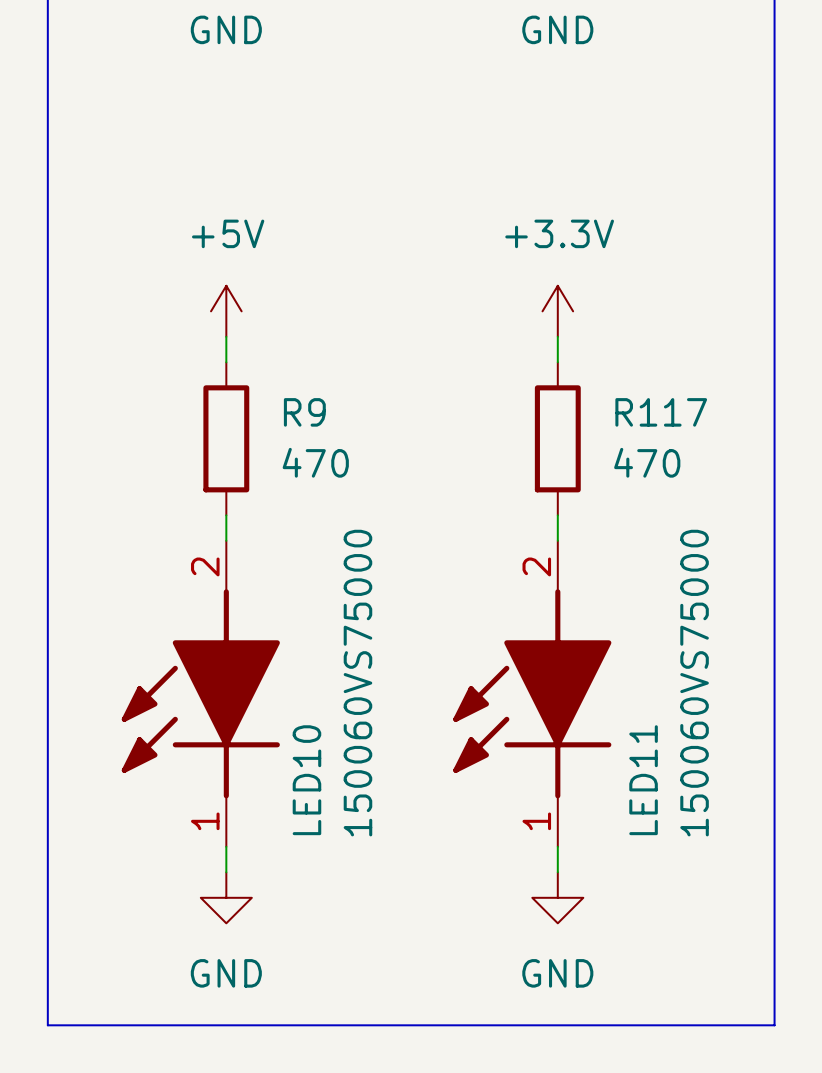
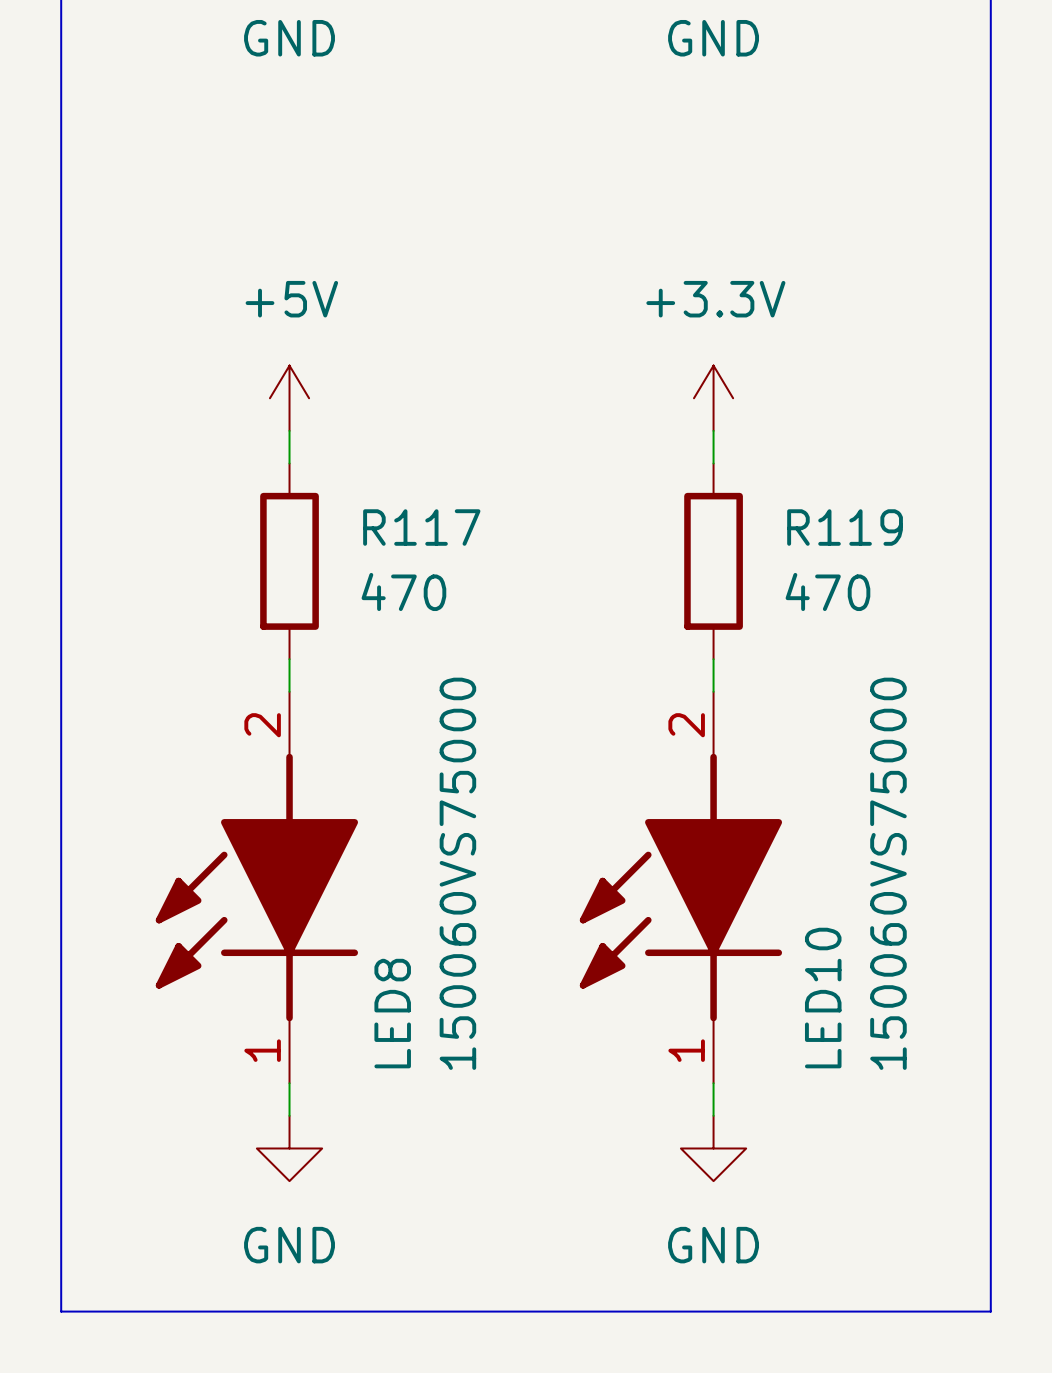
R9 name: R9 (304, 412) -> R117 (421, 527)
R117 name: R117 (661, 412) -> R119 (845, 527)
LED10 name: LED10 (306, 780) -> LED8 (392, 1013)
LED11 name: LED11 (643, 780) -> LED10 (823, 998)

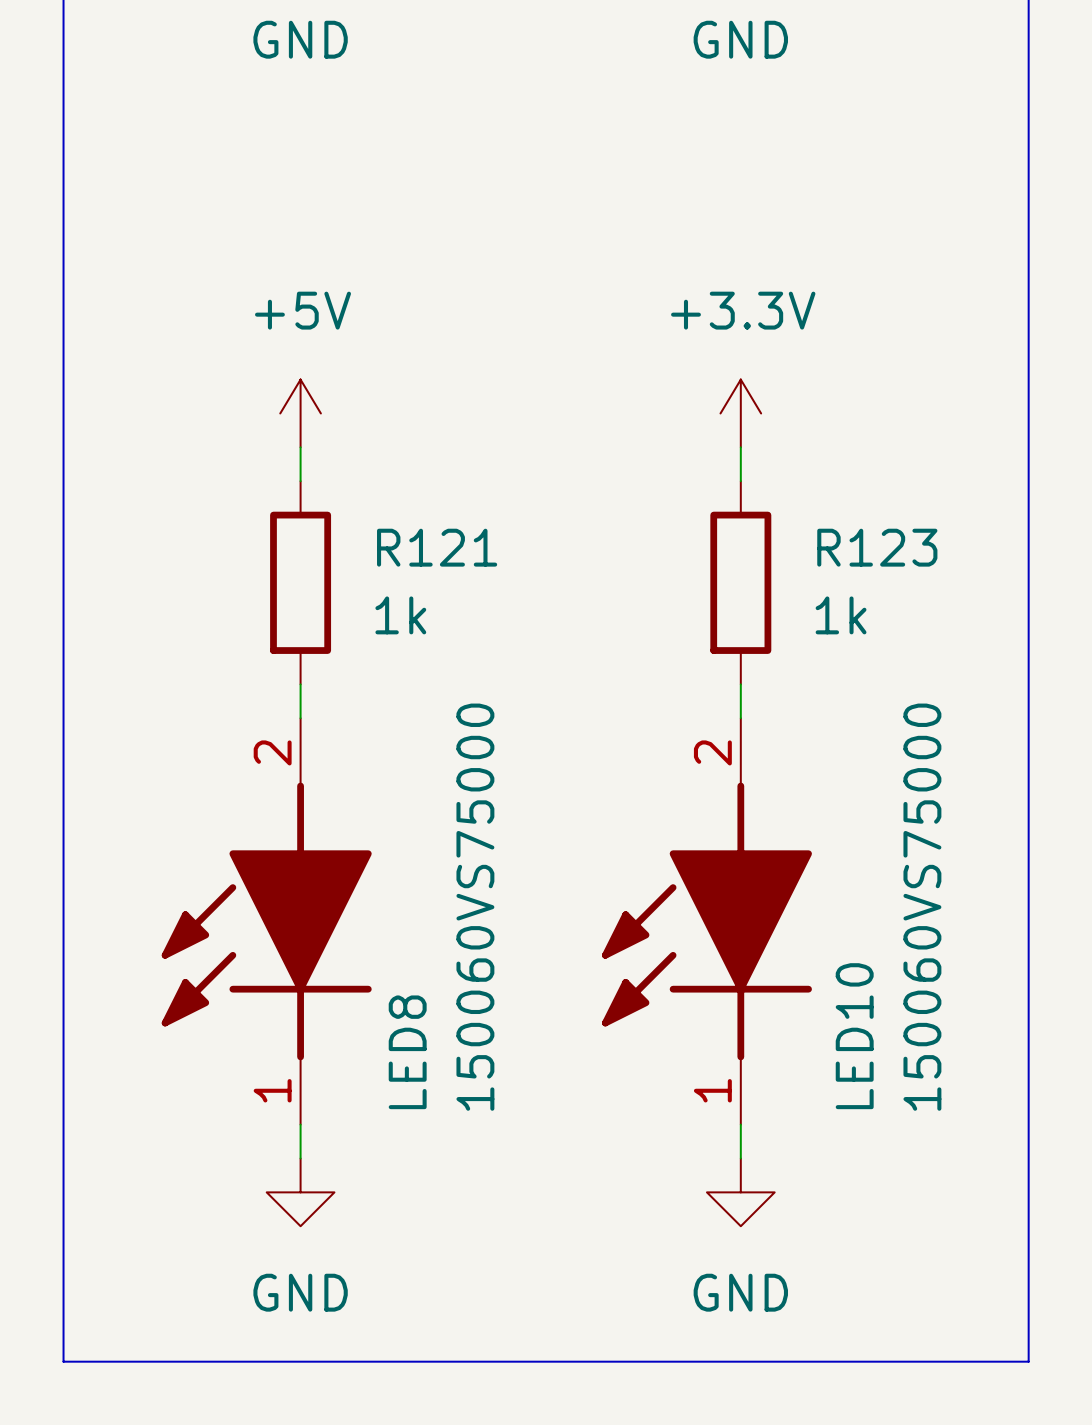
R117 name: R117 (421, 527) -> R121 (437, 547)
R119 name: R119 (845, 527) -> R123 (877, 547)
R117 value: 470 (403, 591) -> 1k (400, 615)
R119 value: 470 (827, 591) -> 1k (841, 615)

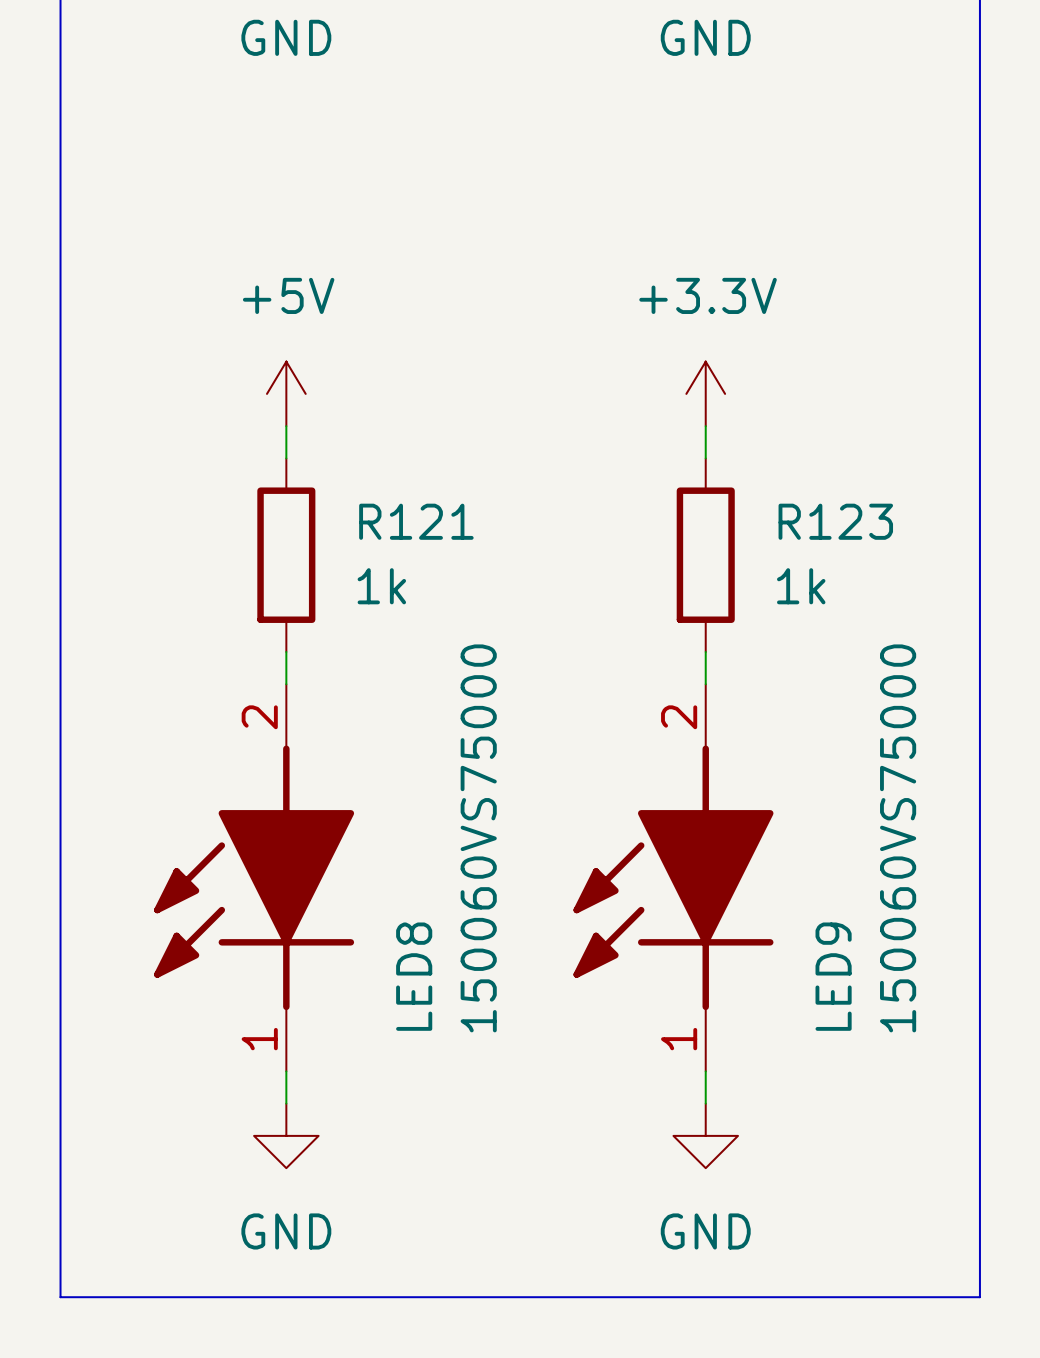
LED8 value position: 150060VS75000 (475, 907) -> 150060VS75000 (478, 838)
LED10 value position: 150060VS75000 (922, 907) -> 150060VS75000 (898, 838)
LED10 name: LED10 (854, 1036) -> LED9 (833, 976)
LED8 name position: LED8 (407, 1052) -> LED8 (414, 976)

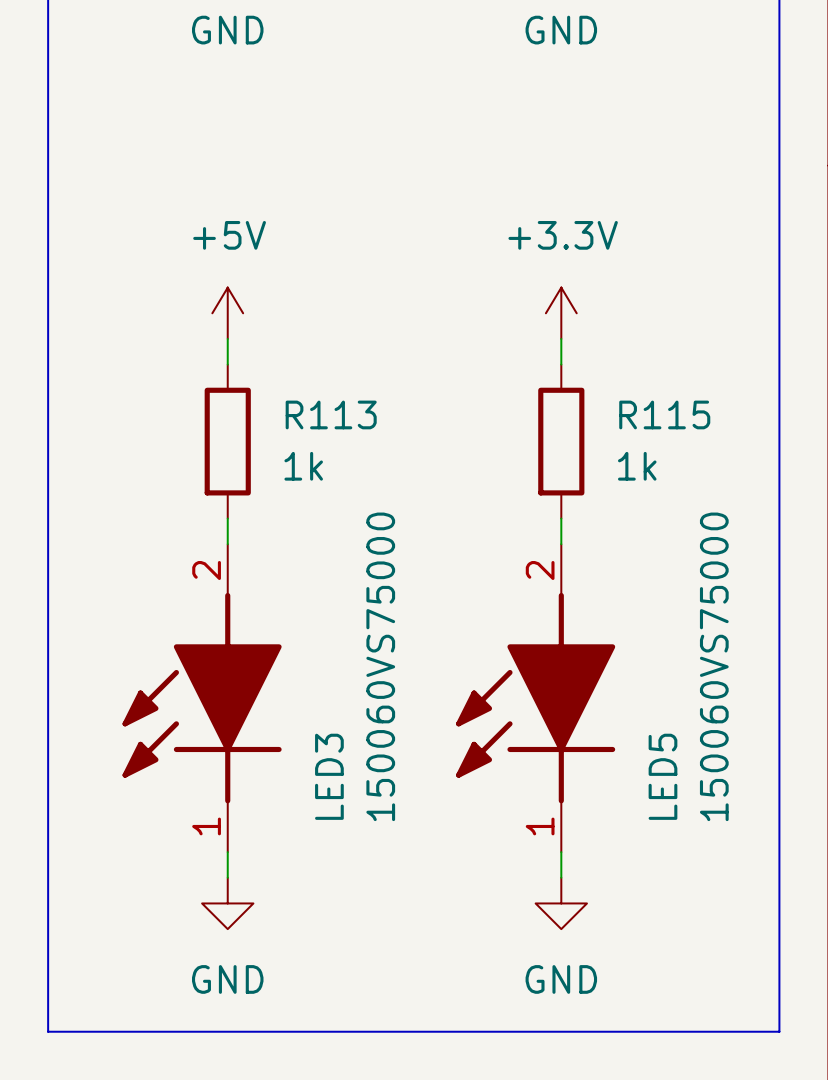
R121 name: R121 (416, 521) -> R113 (331, 414)
R123 name: R123 (835, 521) -> R115 (664, 414)
LED8 name: LED8 (414, 976) -> LED3 (329, 776)
LED9 name: LED9 (833, 976) -> LED5 (662, 776)

